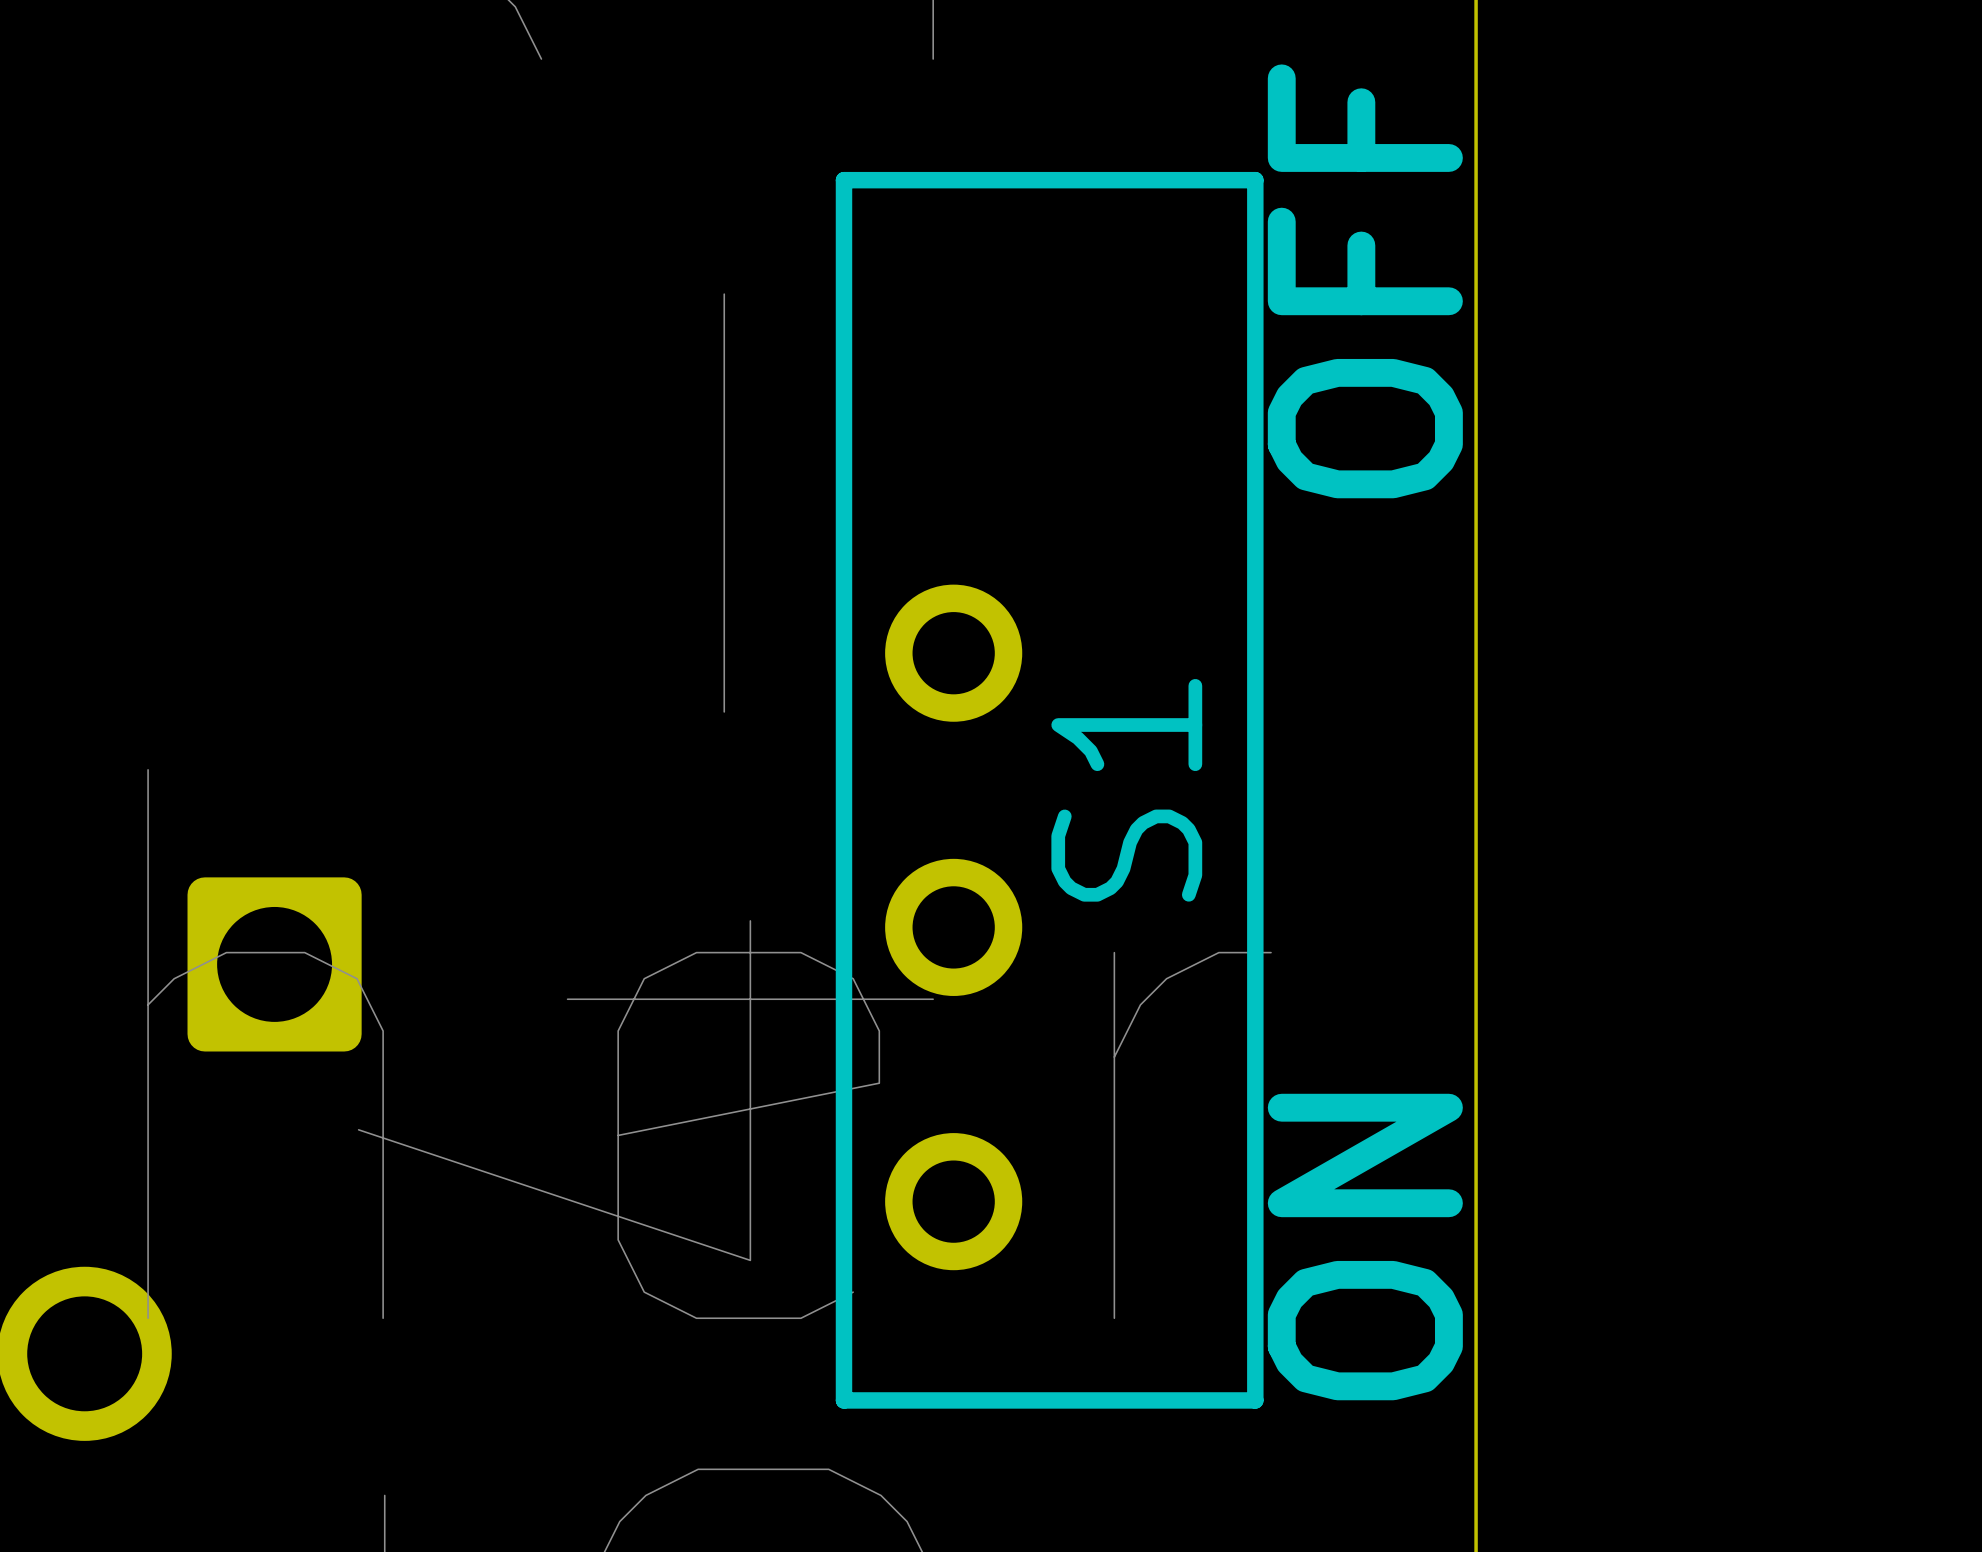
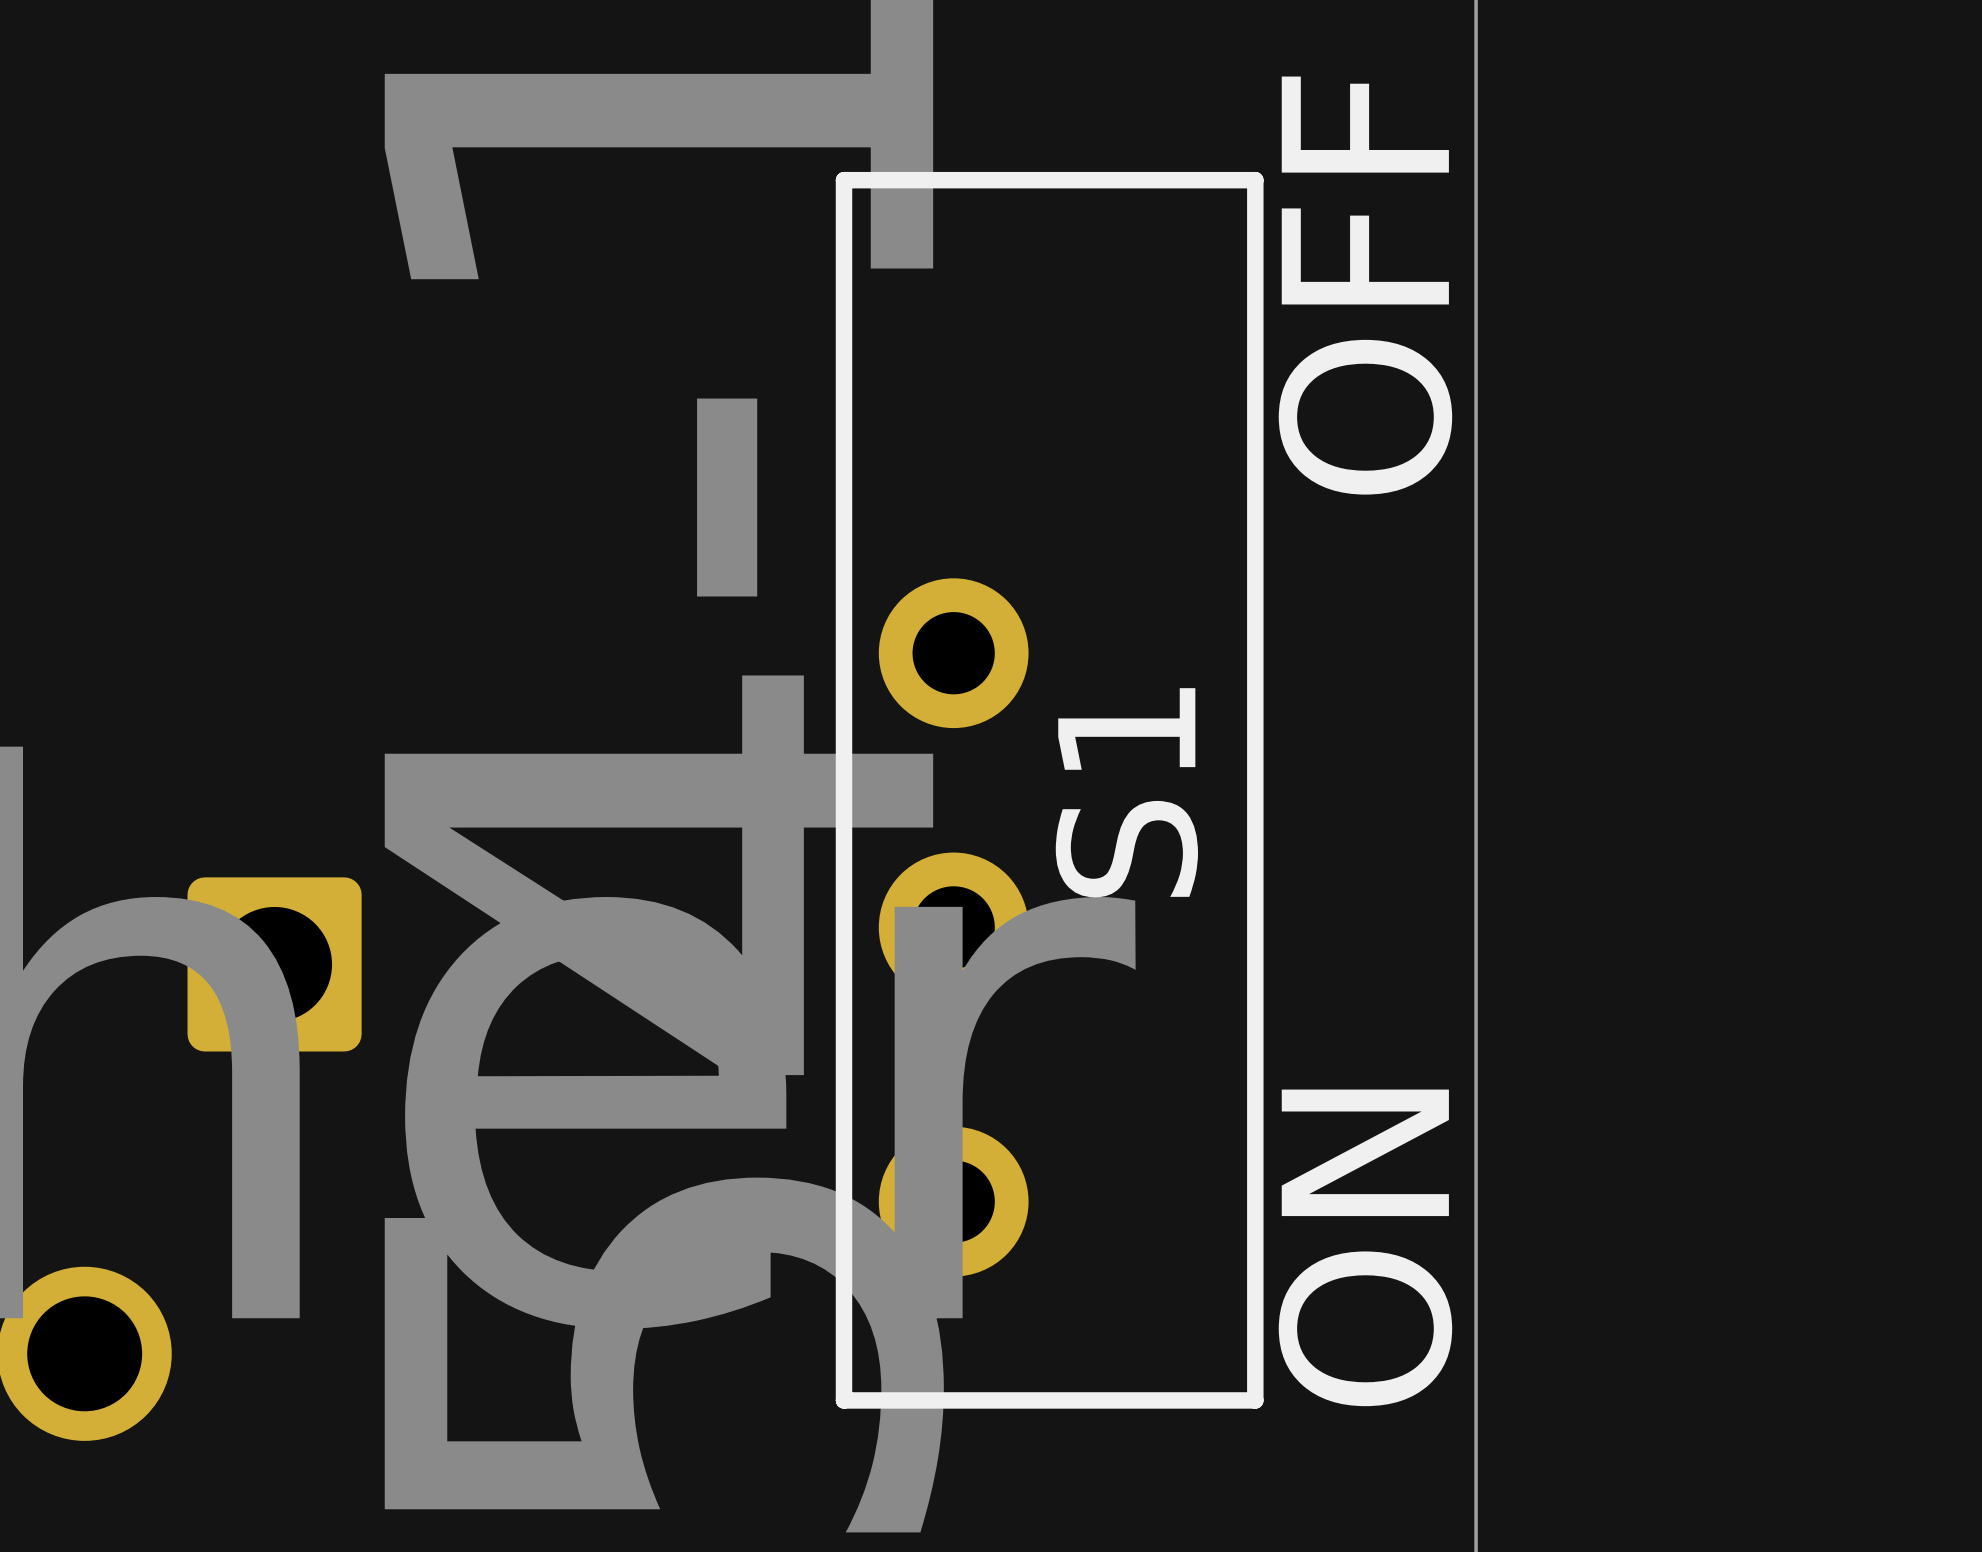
S1 footprint: [835, 171, 1264, 1409] -> [835, 171, 1264, 1409]

